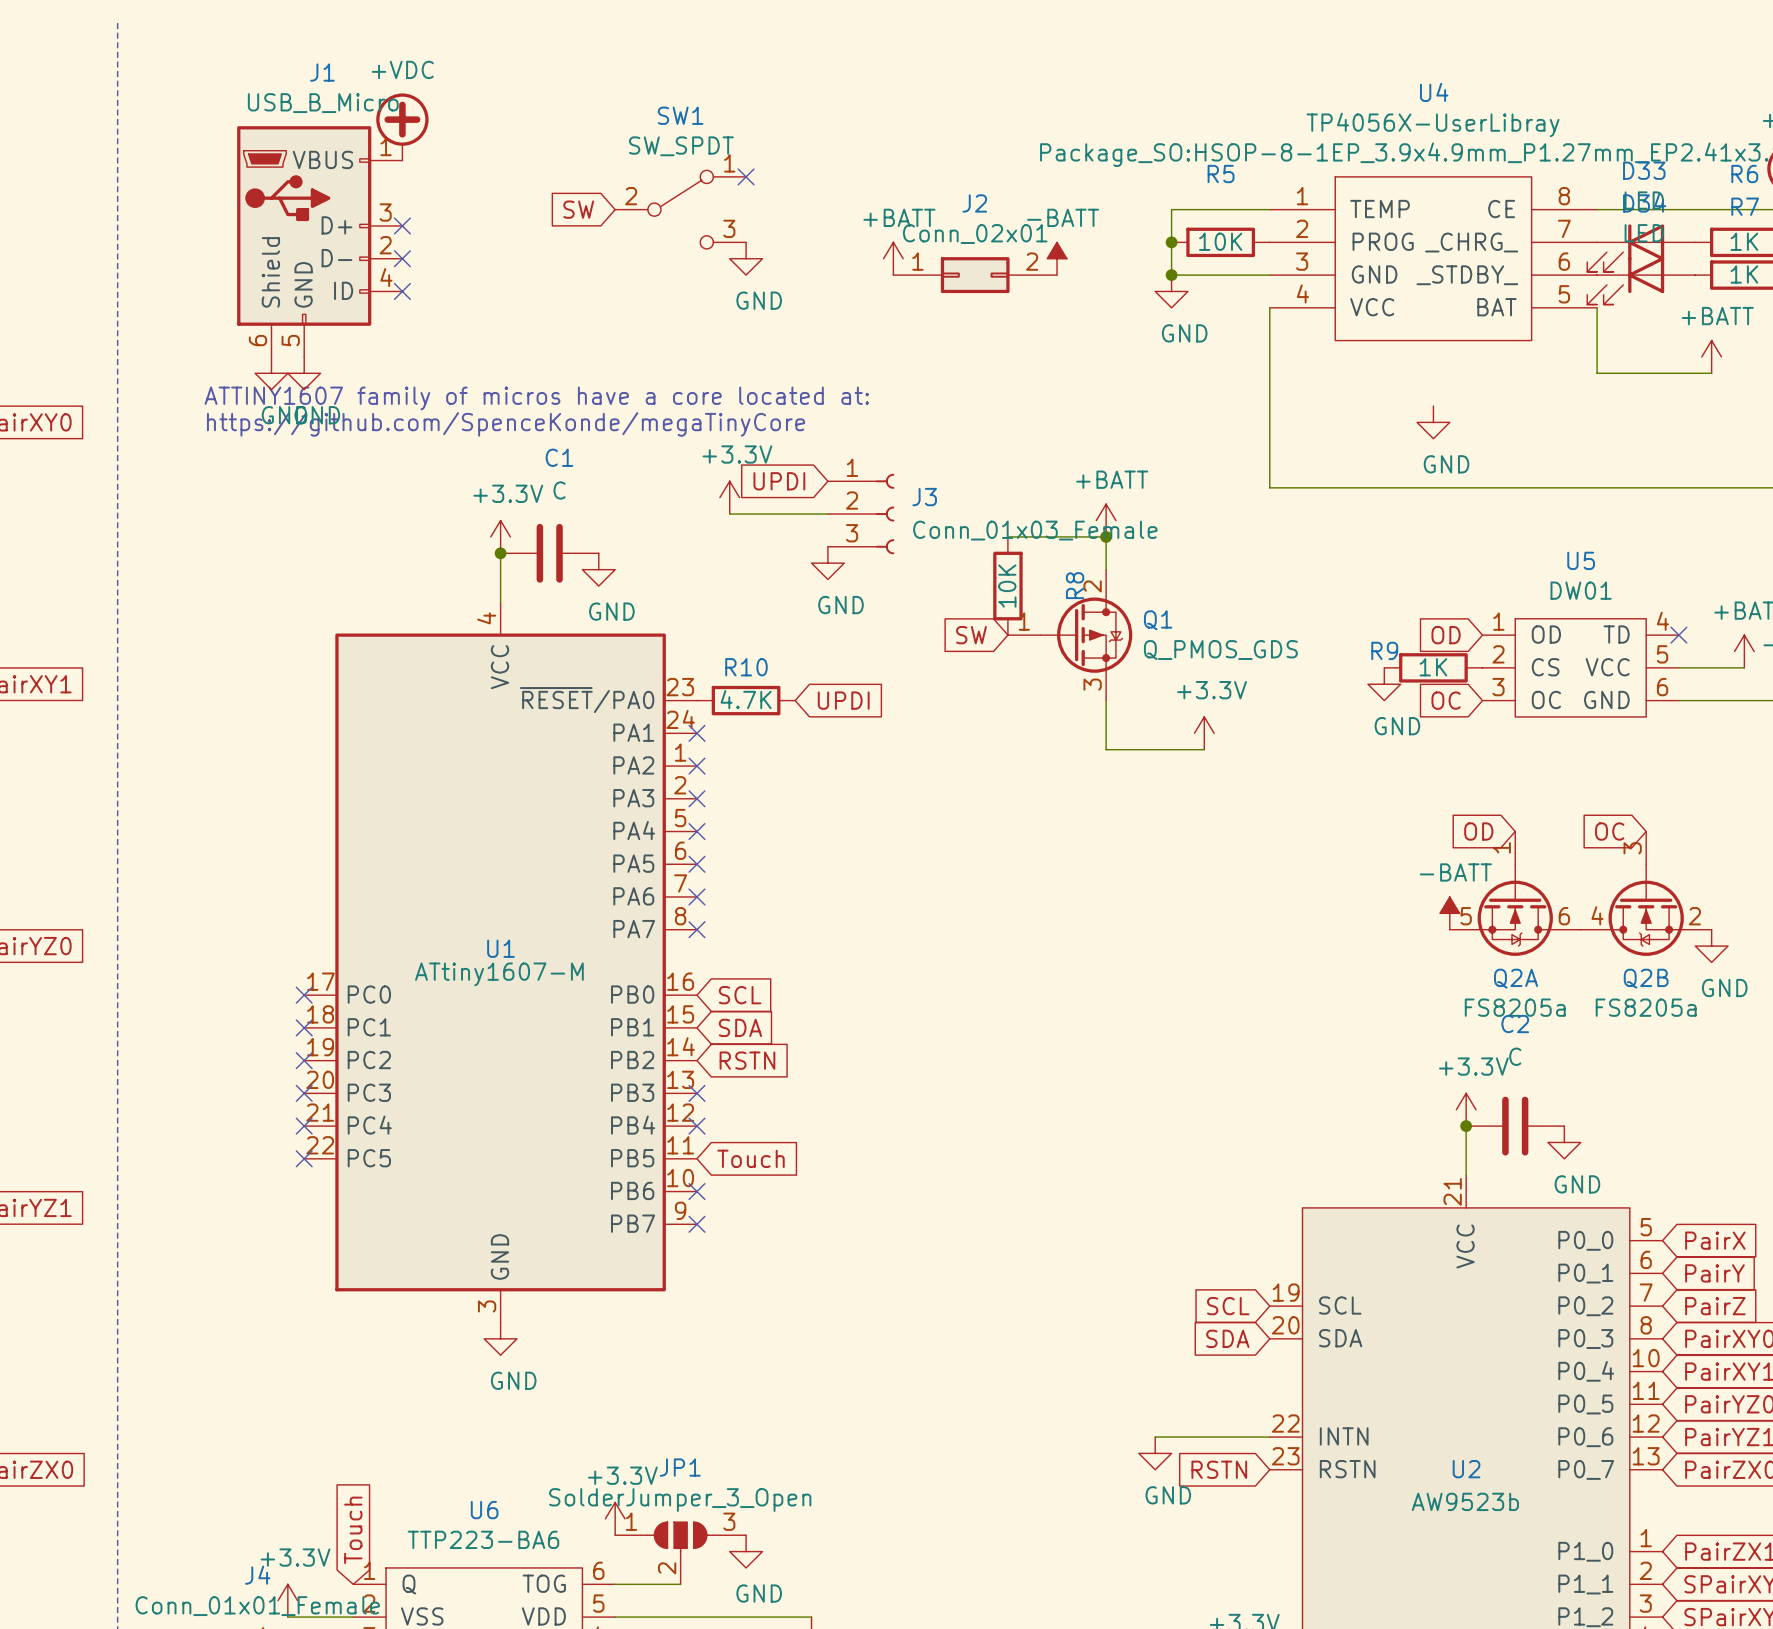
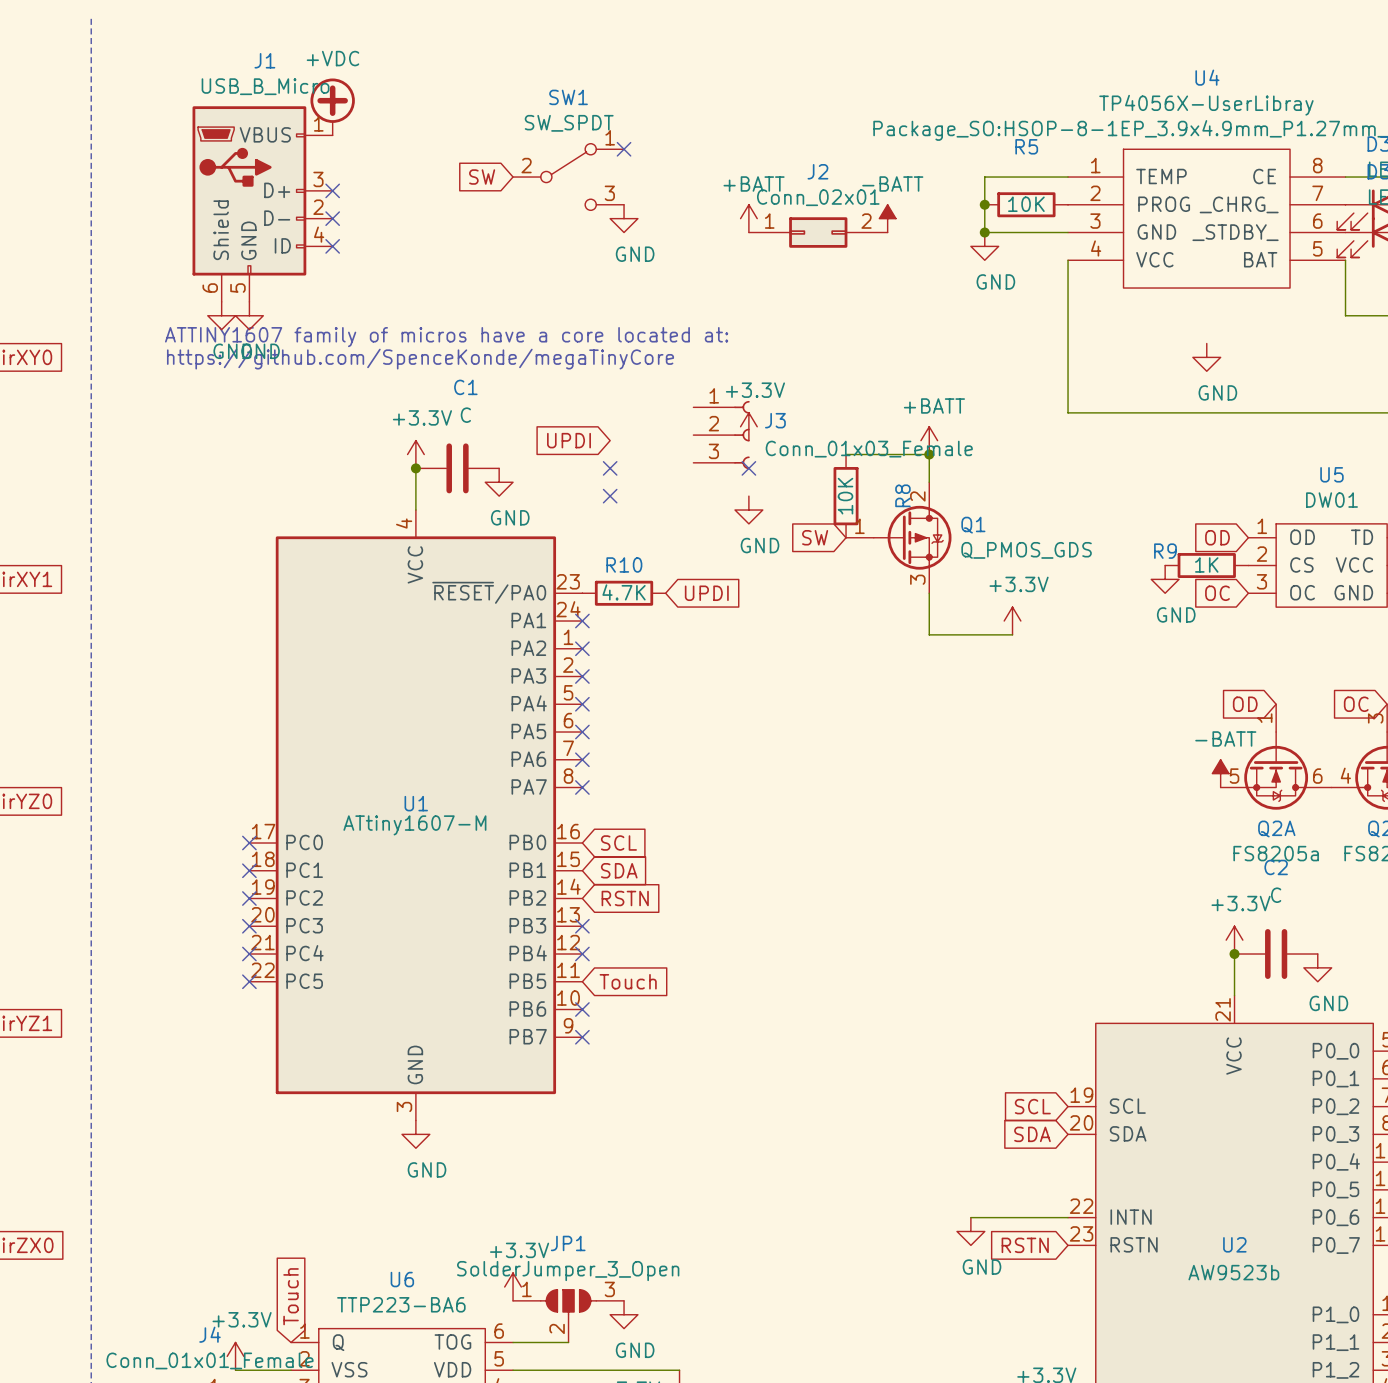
global label position: UPDI (779, 481) -> UPDI (569, 440)
power symbol position: +3.3V (729, 497) -> +3.3V (748, 426)
wire: (729, 514) (827, 514) -> none
no-connect mark: none -> (610, 468)
no-connect mark: none -> (748, 468)
power symbol position: GND (827, 563) -> GND (748, 510)
no-connect mark: none -> (610, 496)

